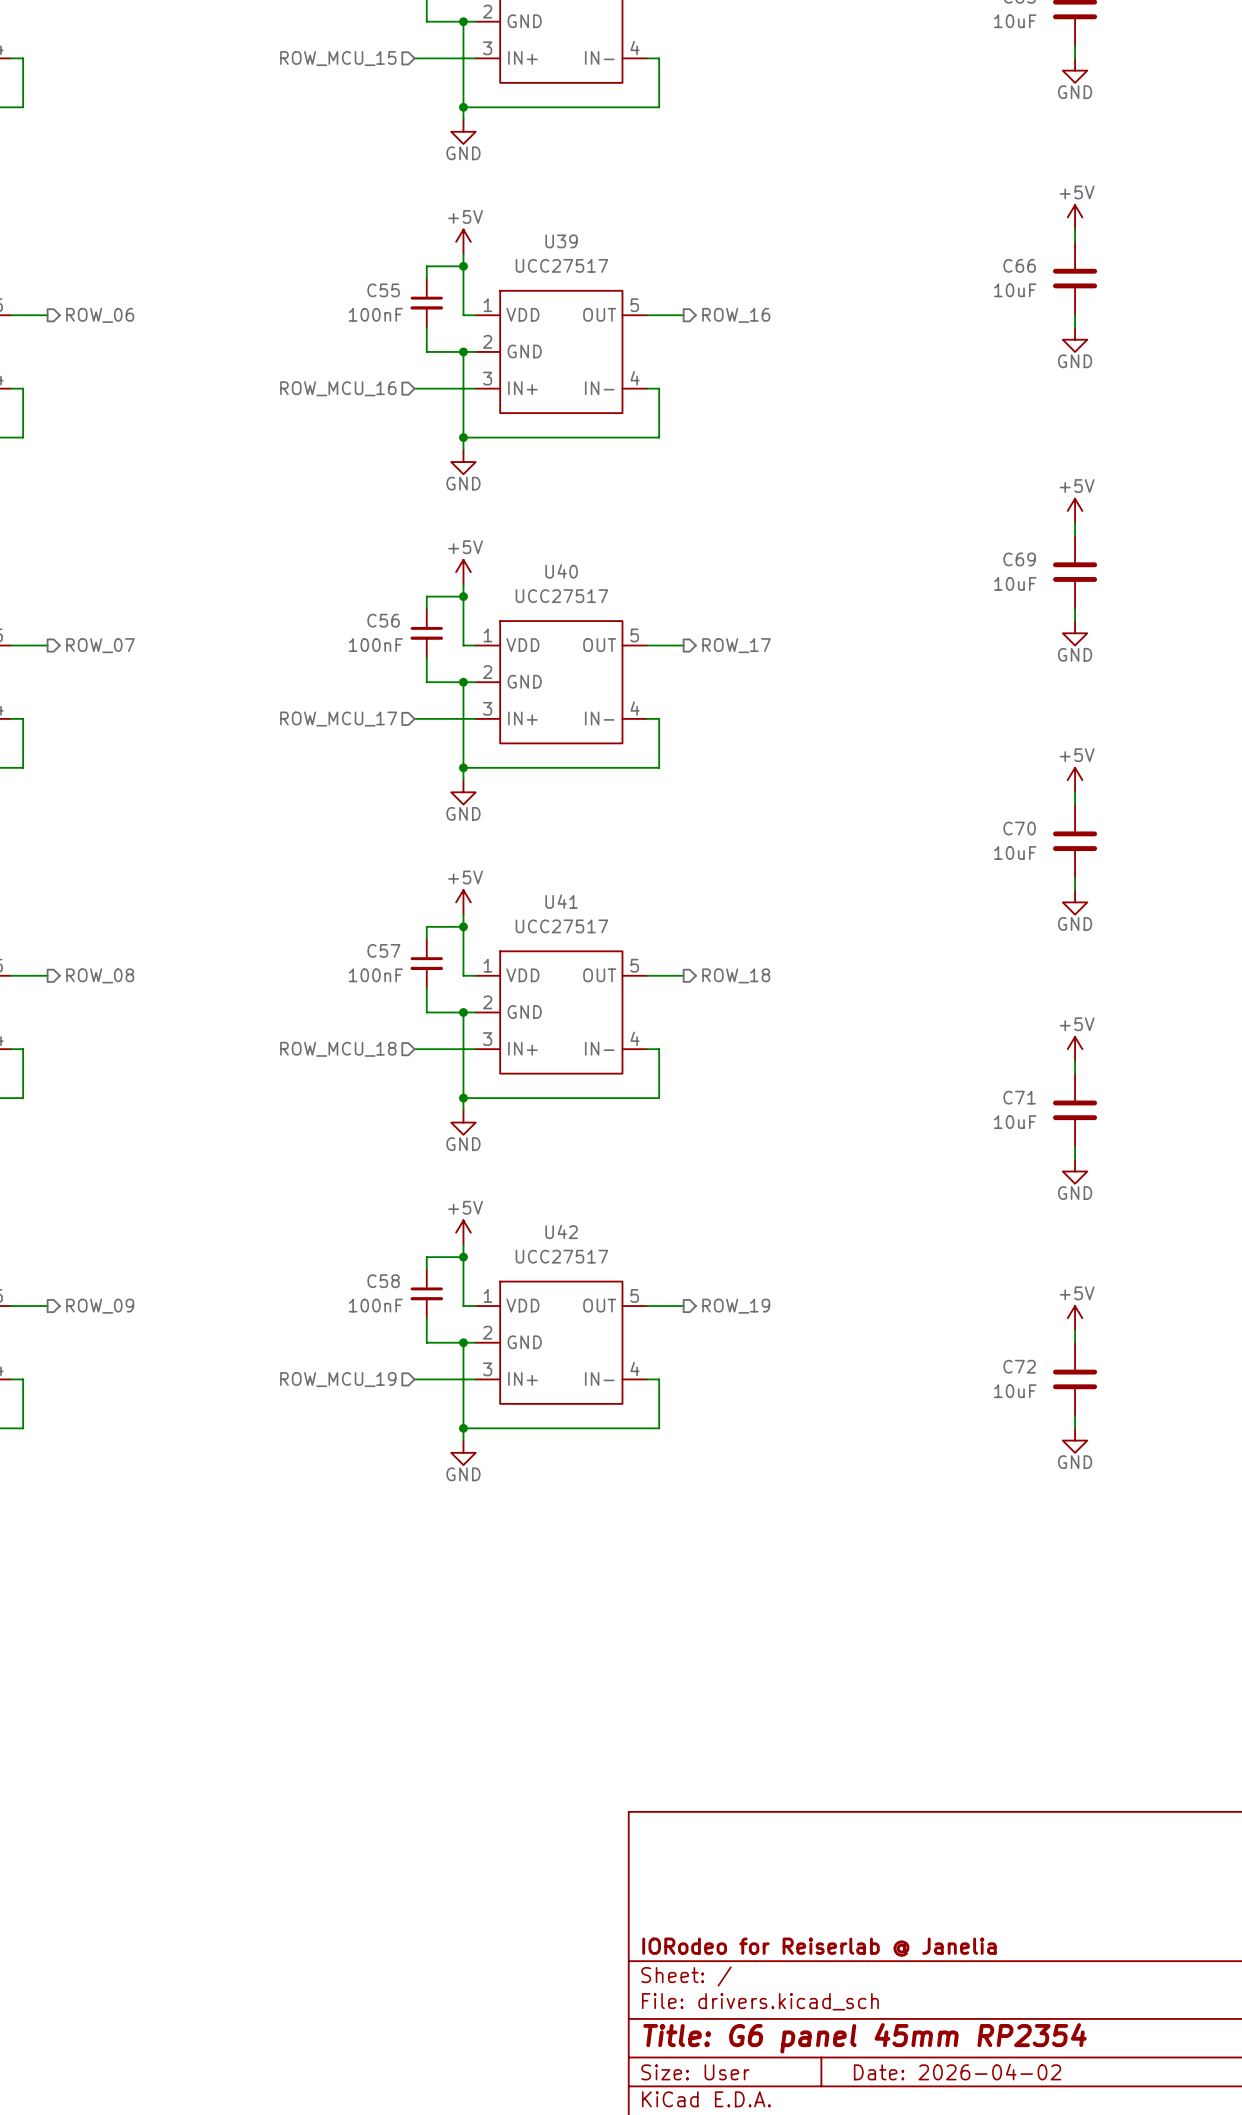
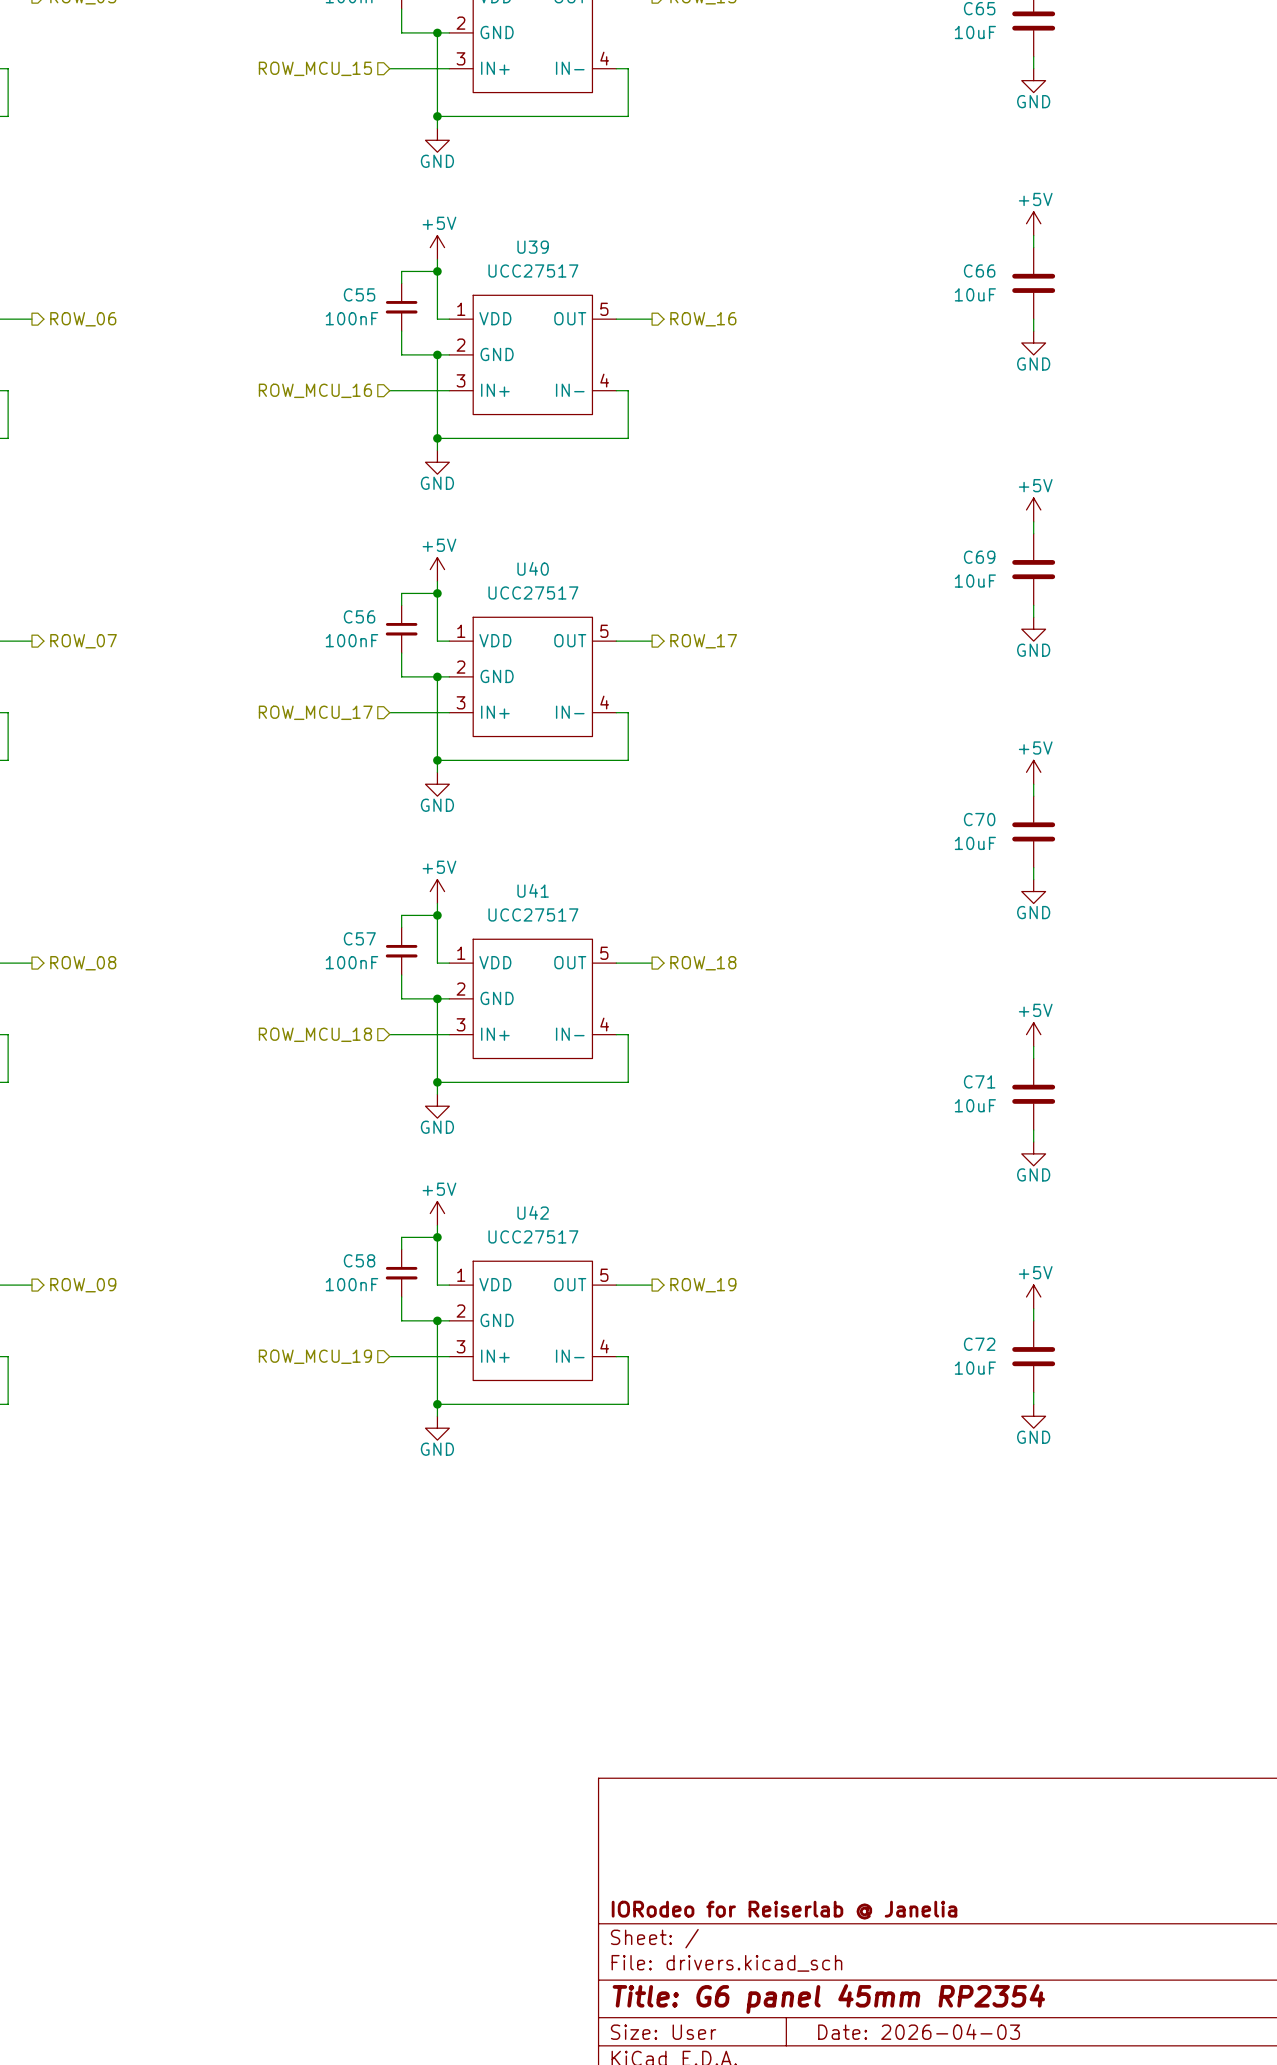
title block: Date: 2026-04-02 (957, 2072) -> Date: 2026-04-03 (919, 2031)

